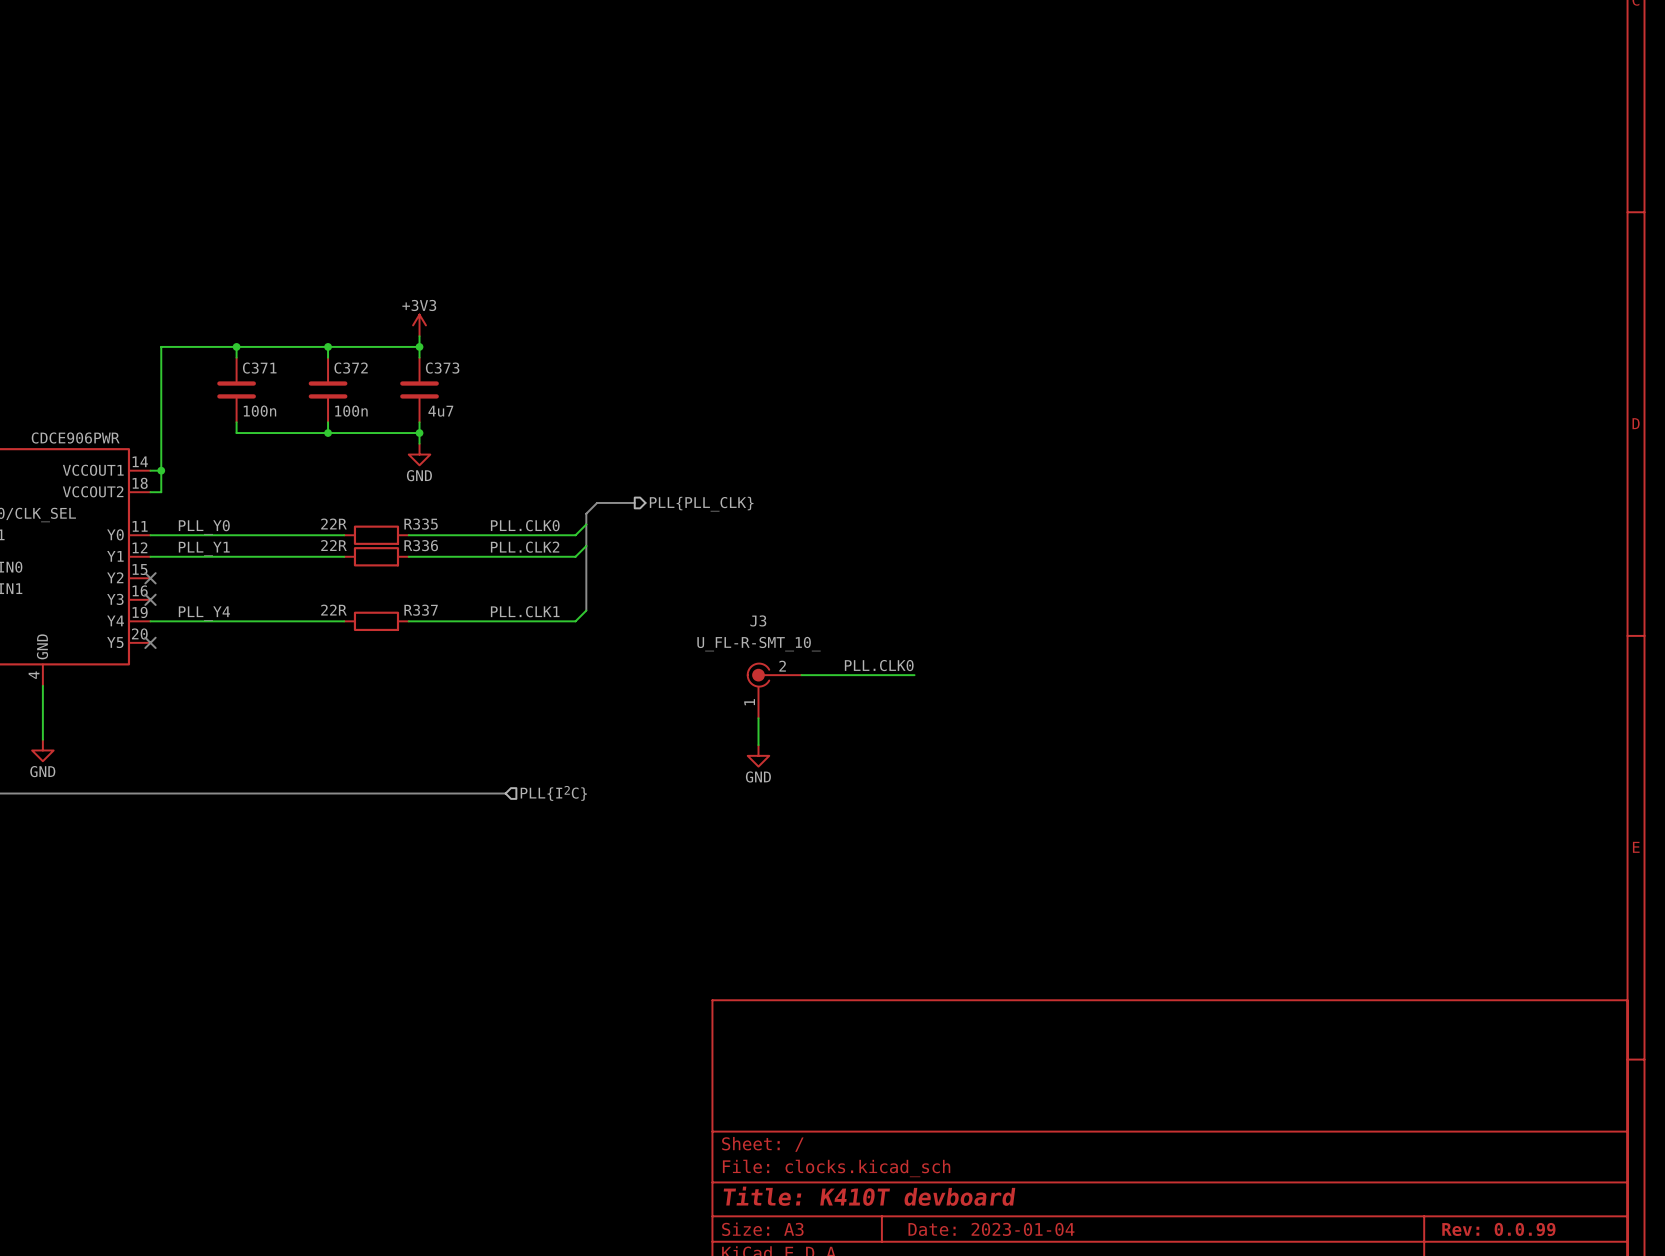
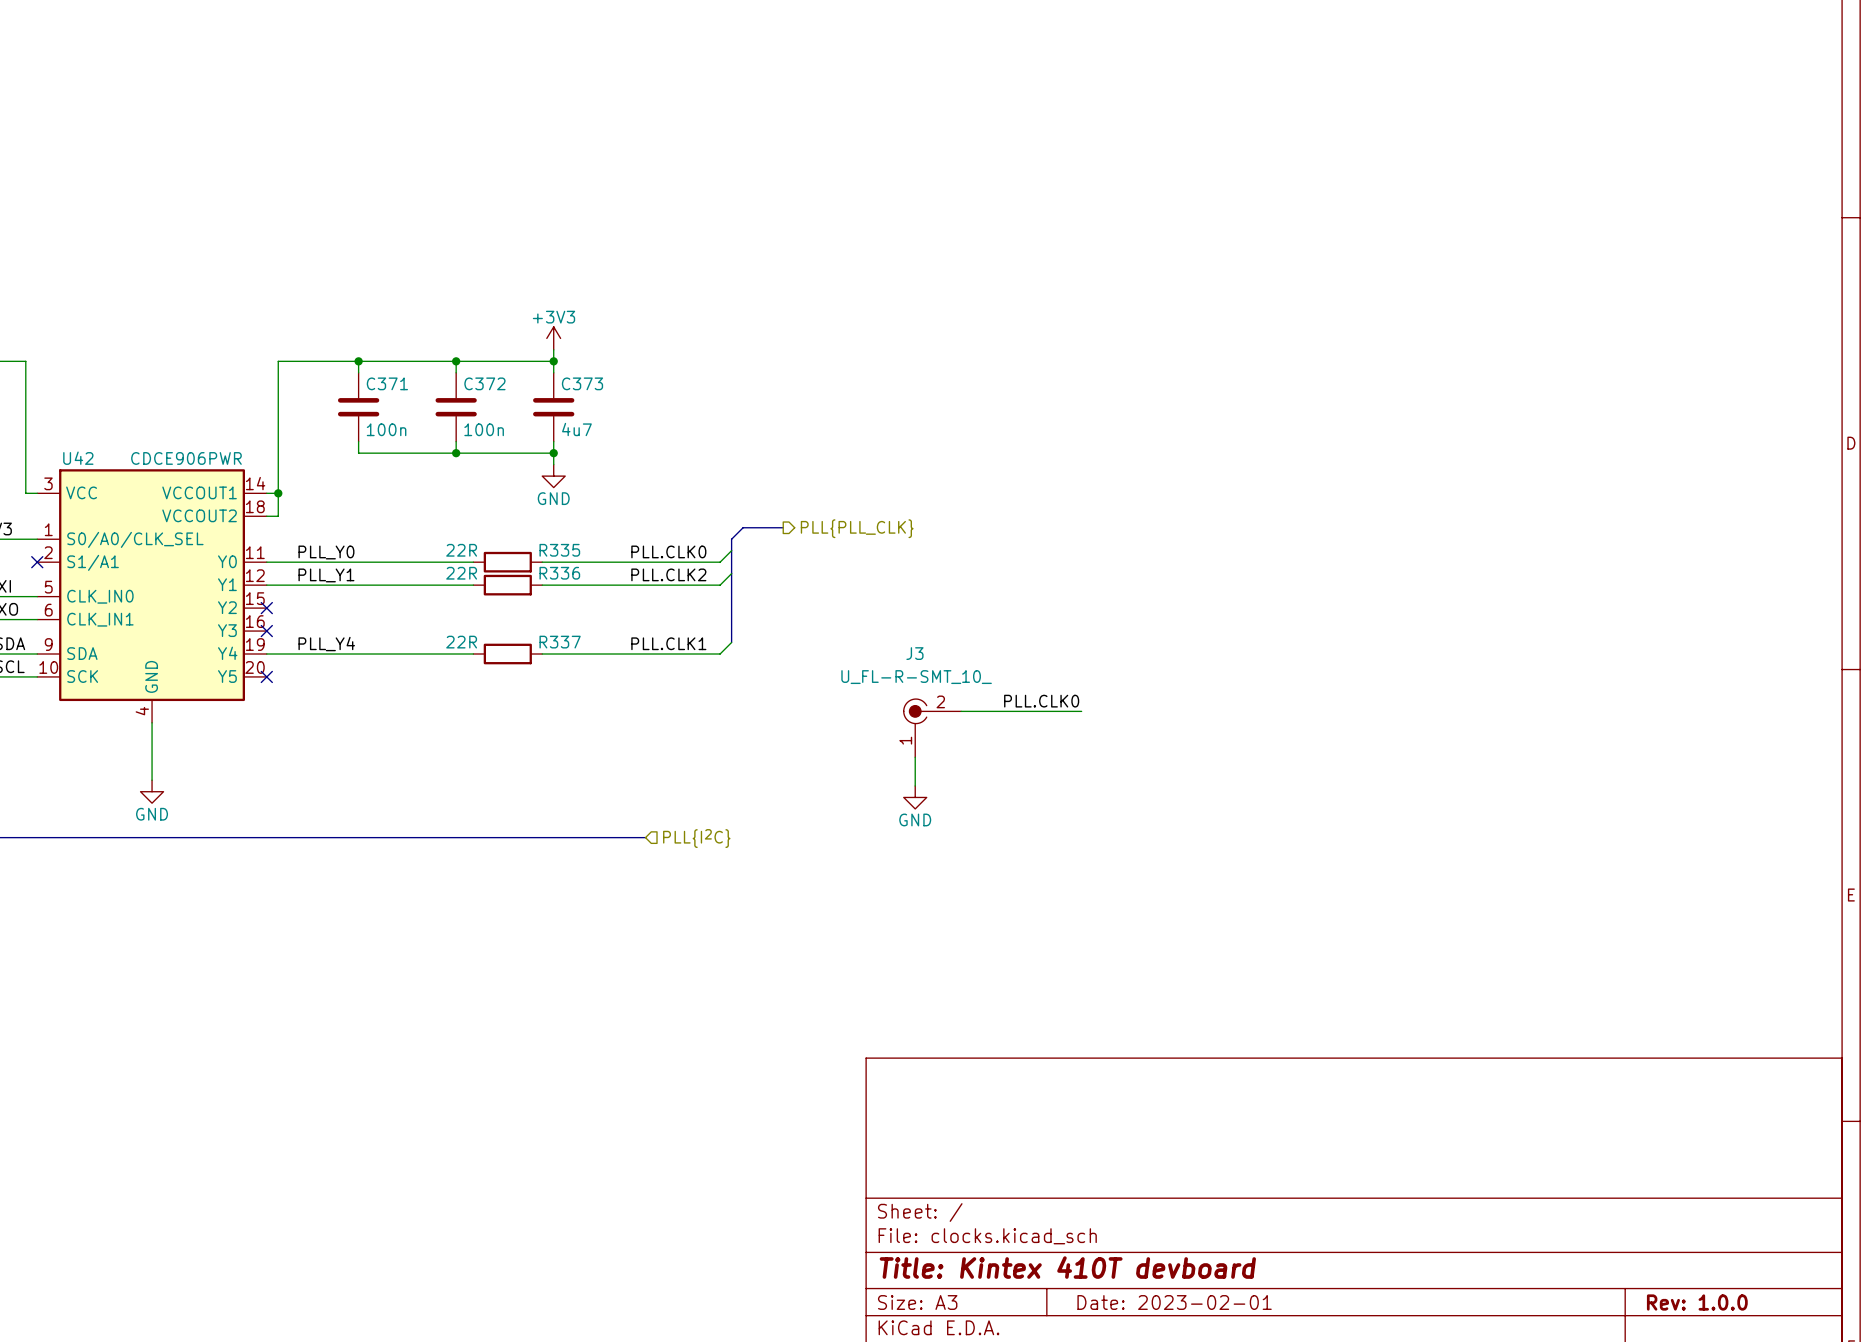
title block: Title: K410T devboard (869, 1196) -> Title: Kintex 410T devboard (1067, 1267)
title block: Date: 2023-01-04 (991, 1229) -> Date: 2023-02-01 (1174, 1302)
title block: Rev: 0.0.99 (1498, 1229) -> Rev: 1.0.0 (1697, 1302)

